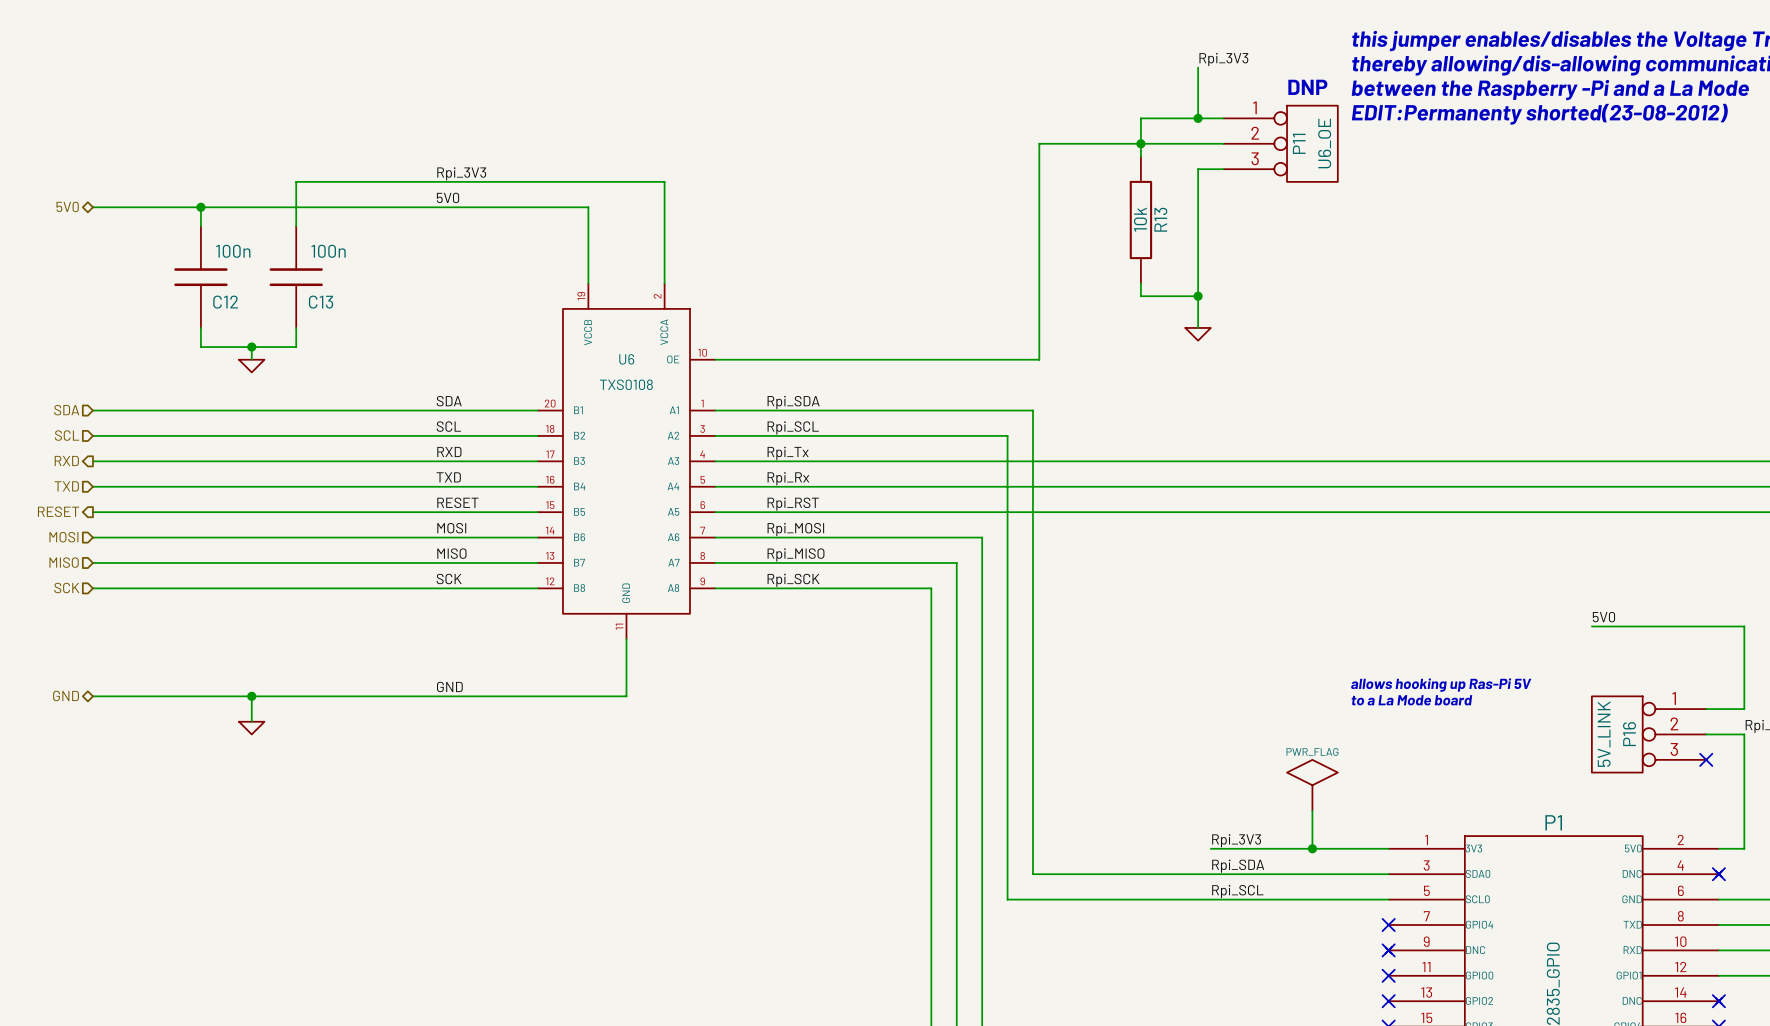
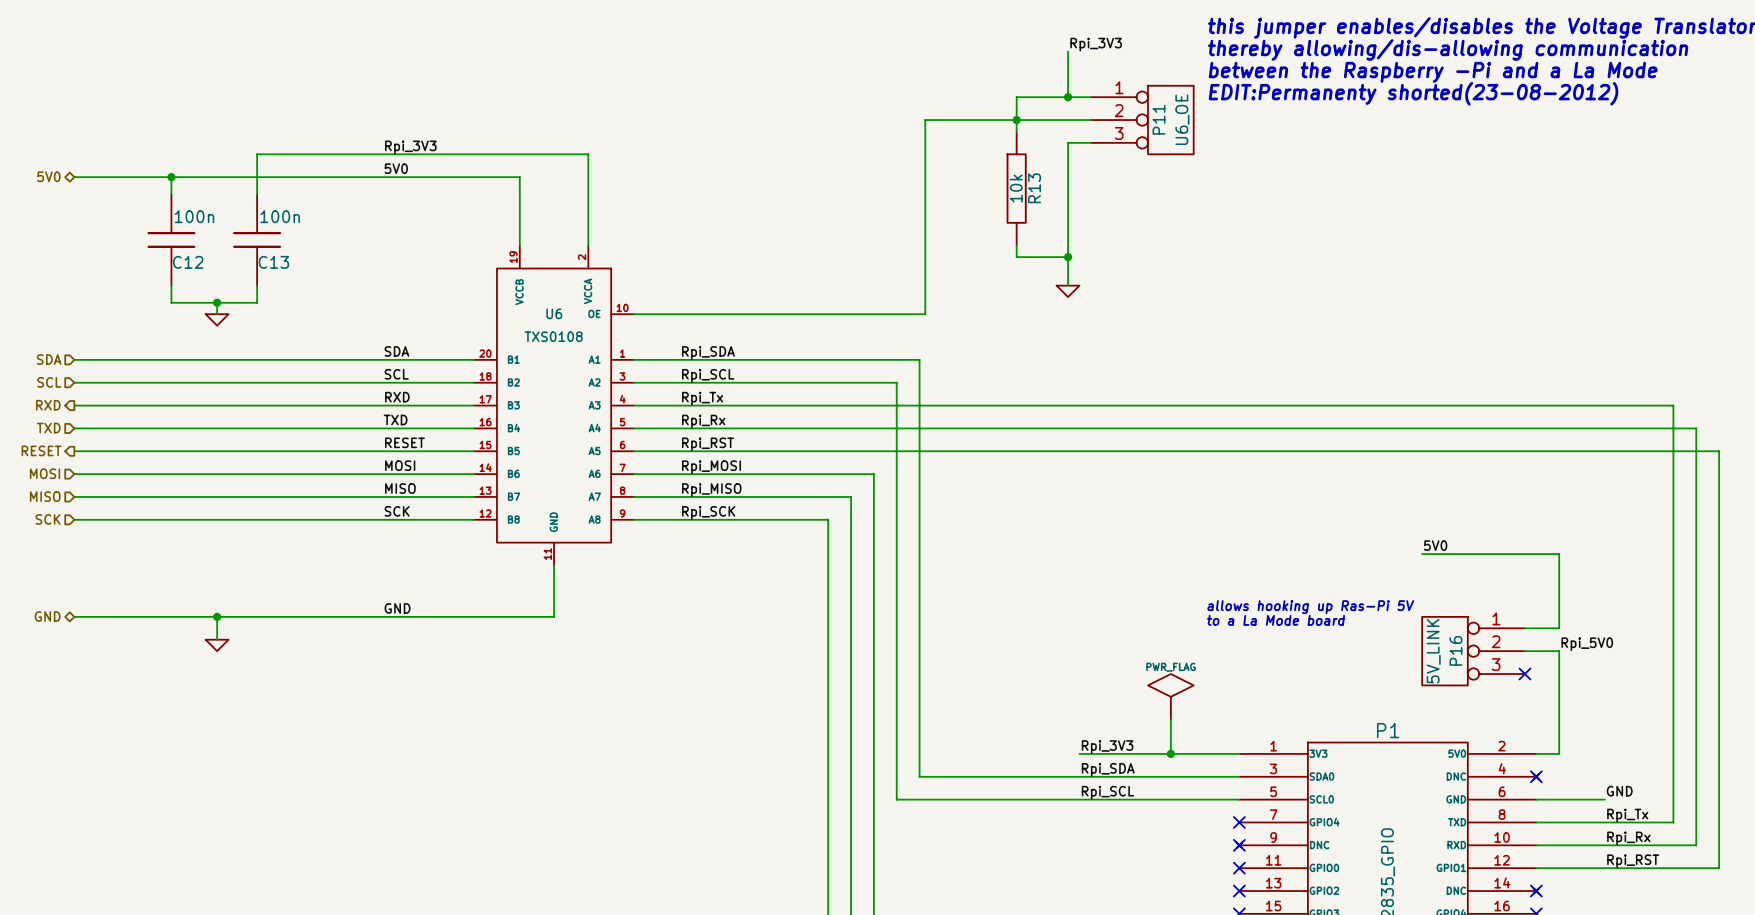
text: DNP (1307, 87) -> none

